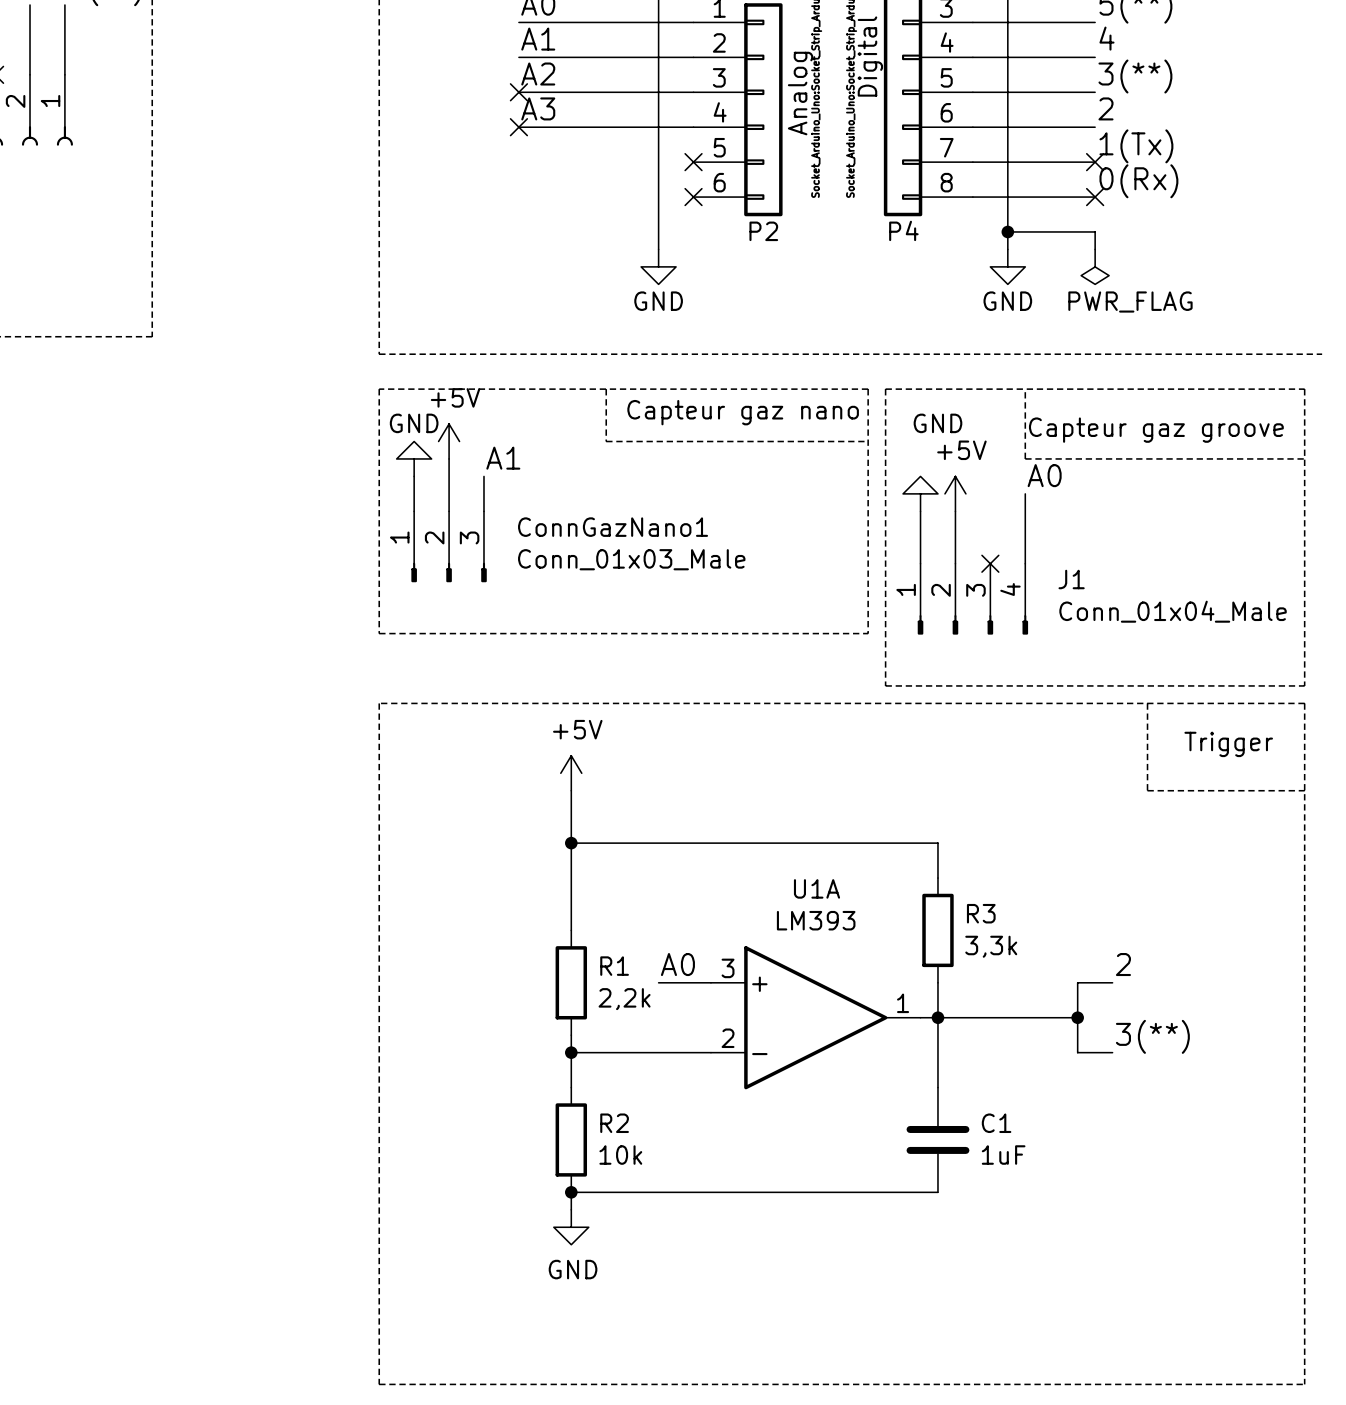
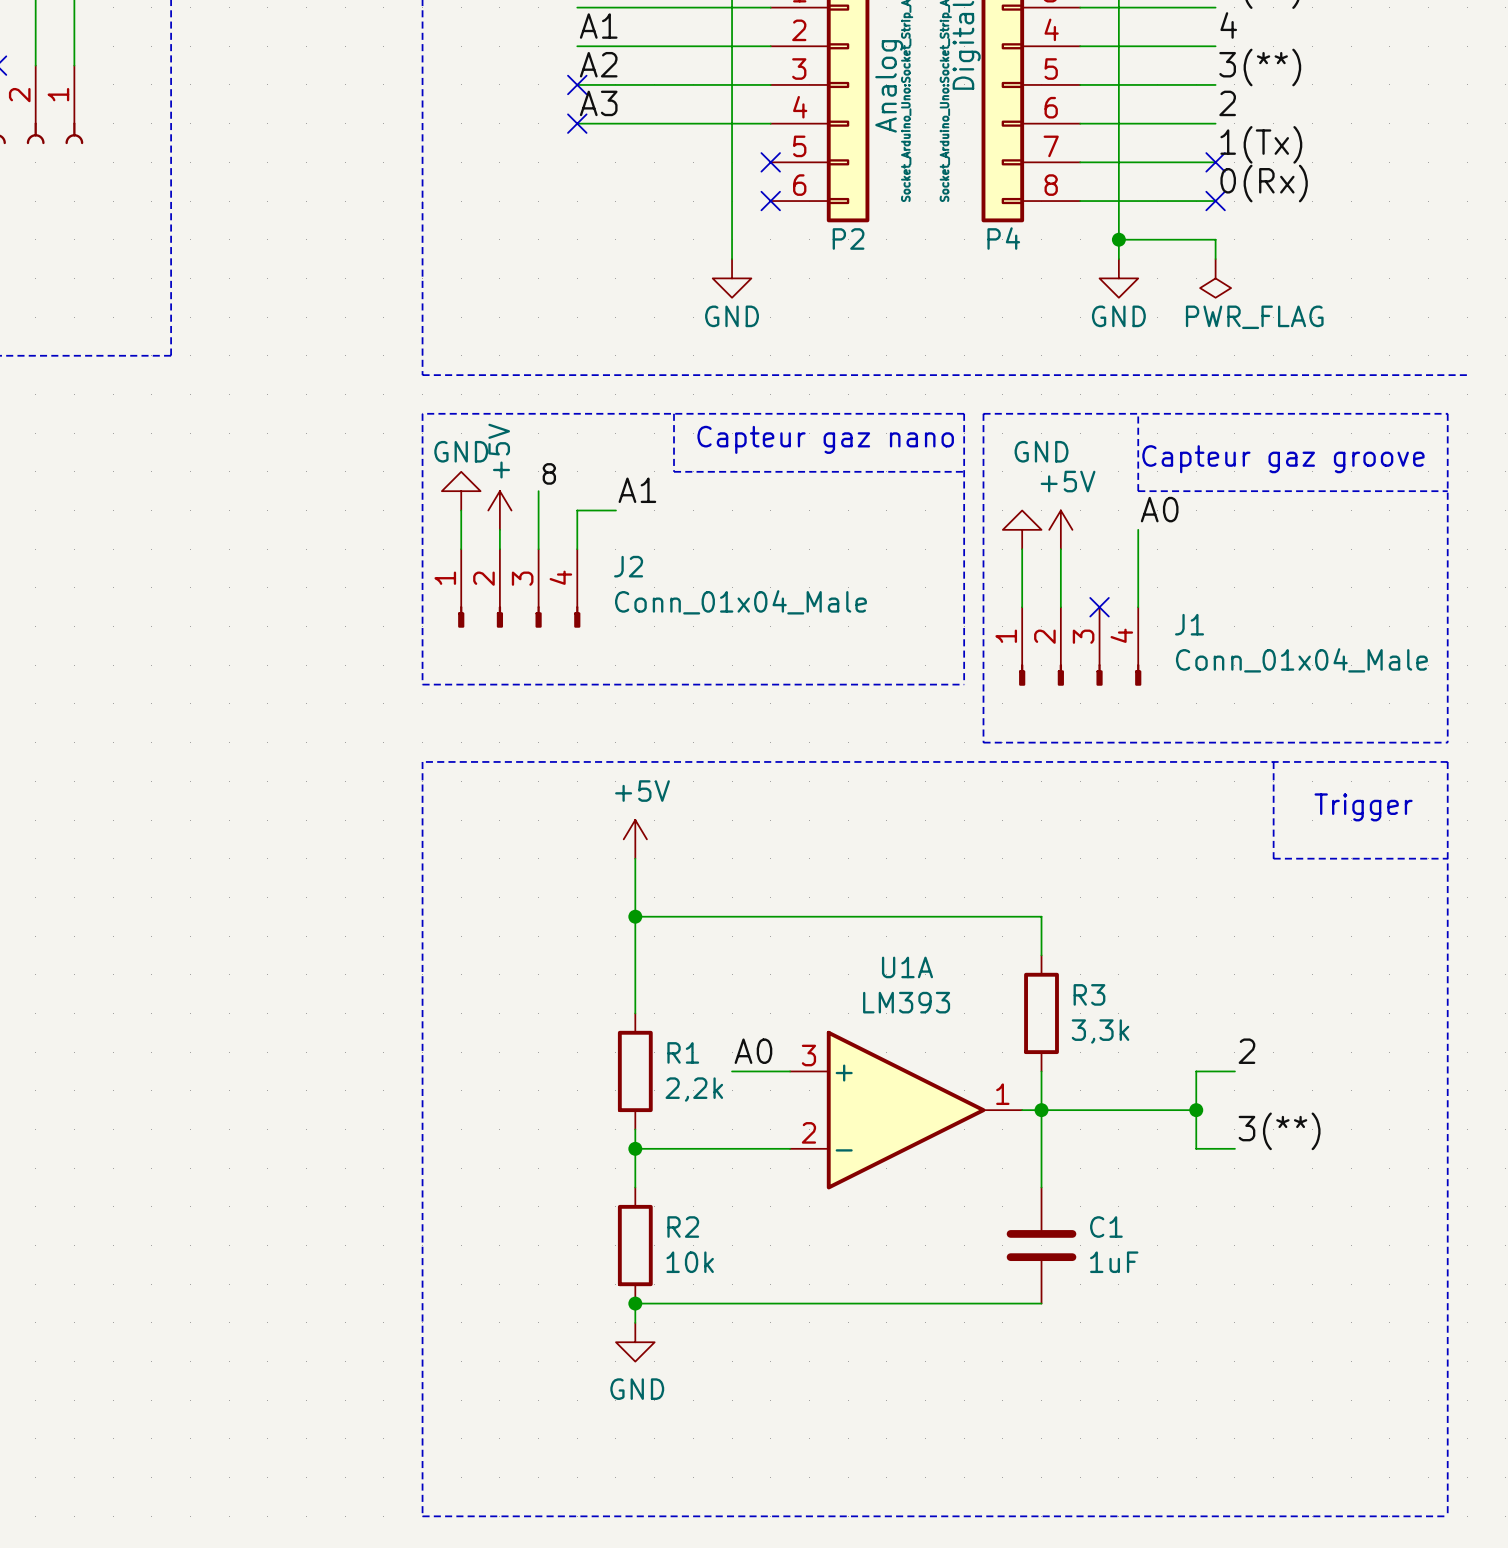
power symbol text rotation: 0° (455, 397) -> 90° counterclockwise (499, 451)
power symbol position: +5V (449, 441) -> +5V (499, 510)
label: none -> 8 (549, 473)
wire: none -> (538, 491) (538, 510)
label position: A1 (503, 458) -> A1 (637, 490)
wire: none -> (615, 510) (577, 510) (577, 549)
ConnGazNano1: Conn_01x03_Male (449, 546) -> none
J2: none -> Conn_01x04_Male (519, 588)

